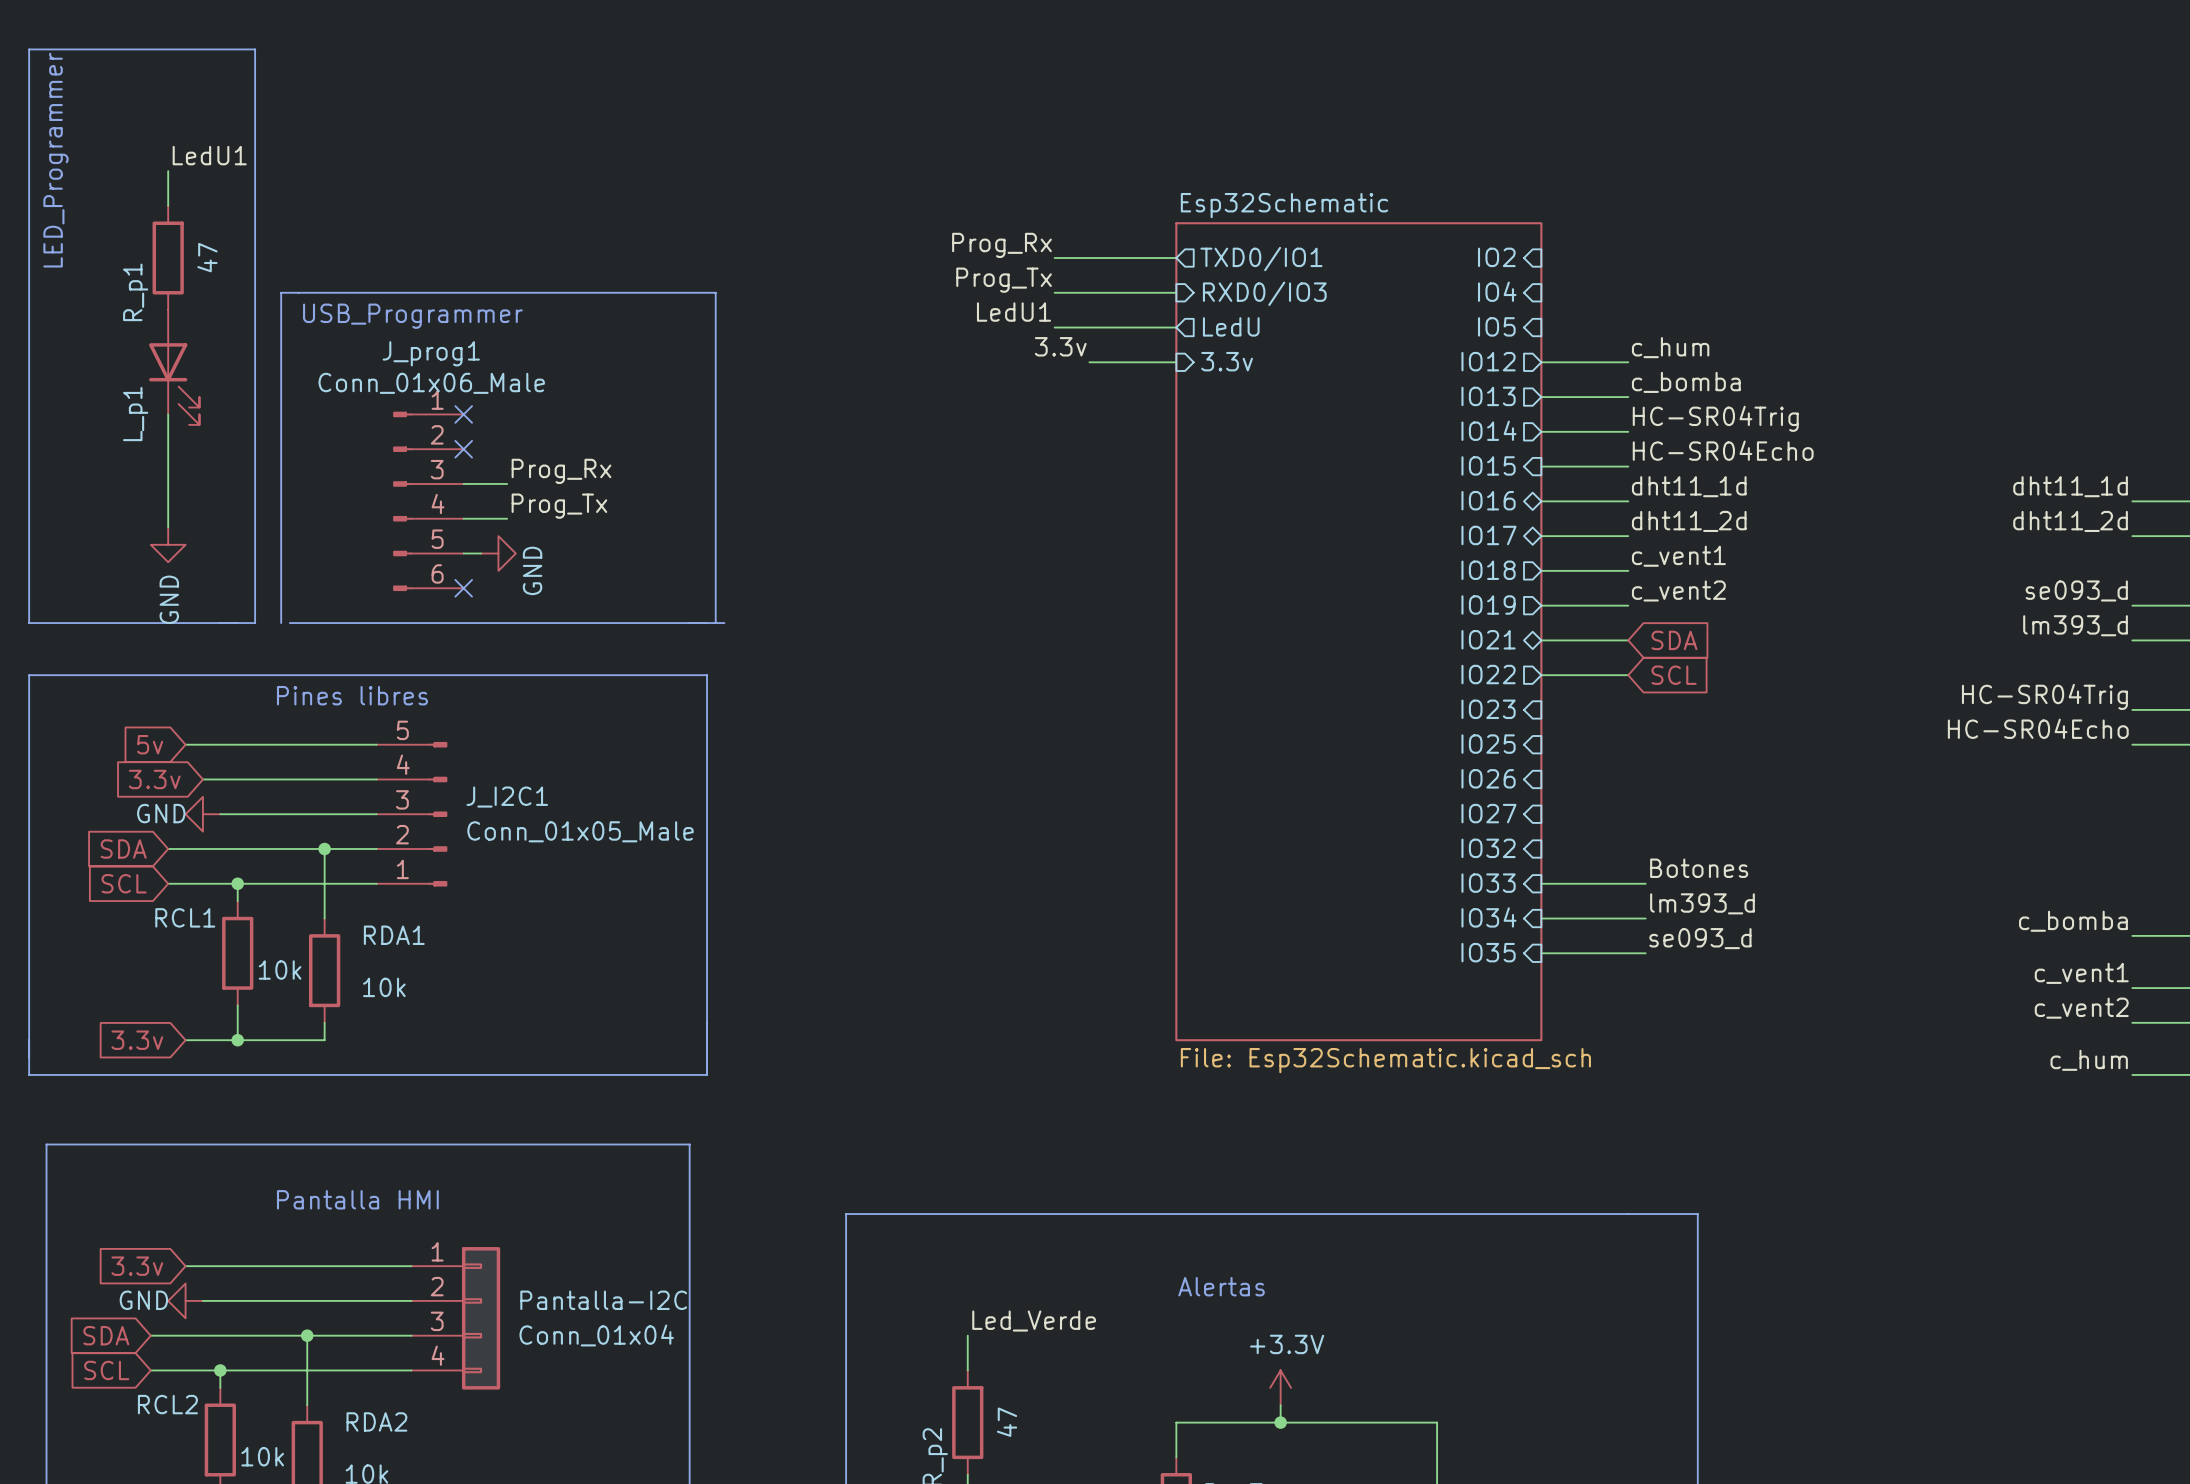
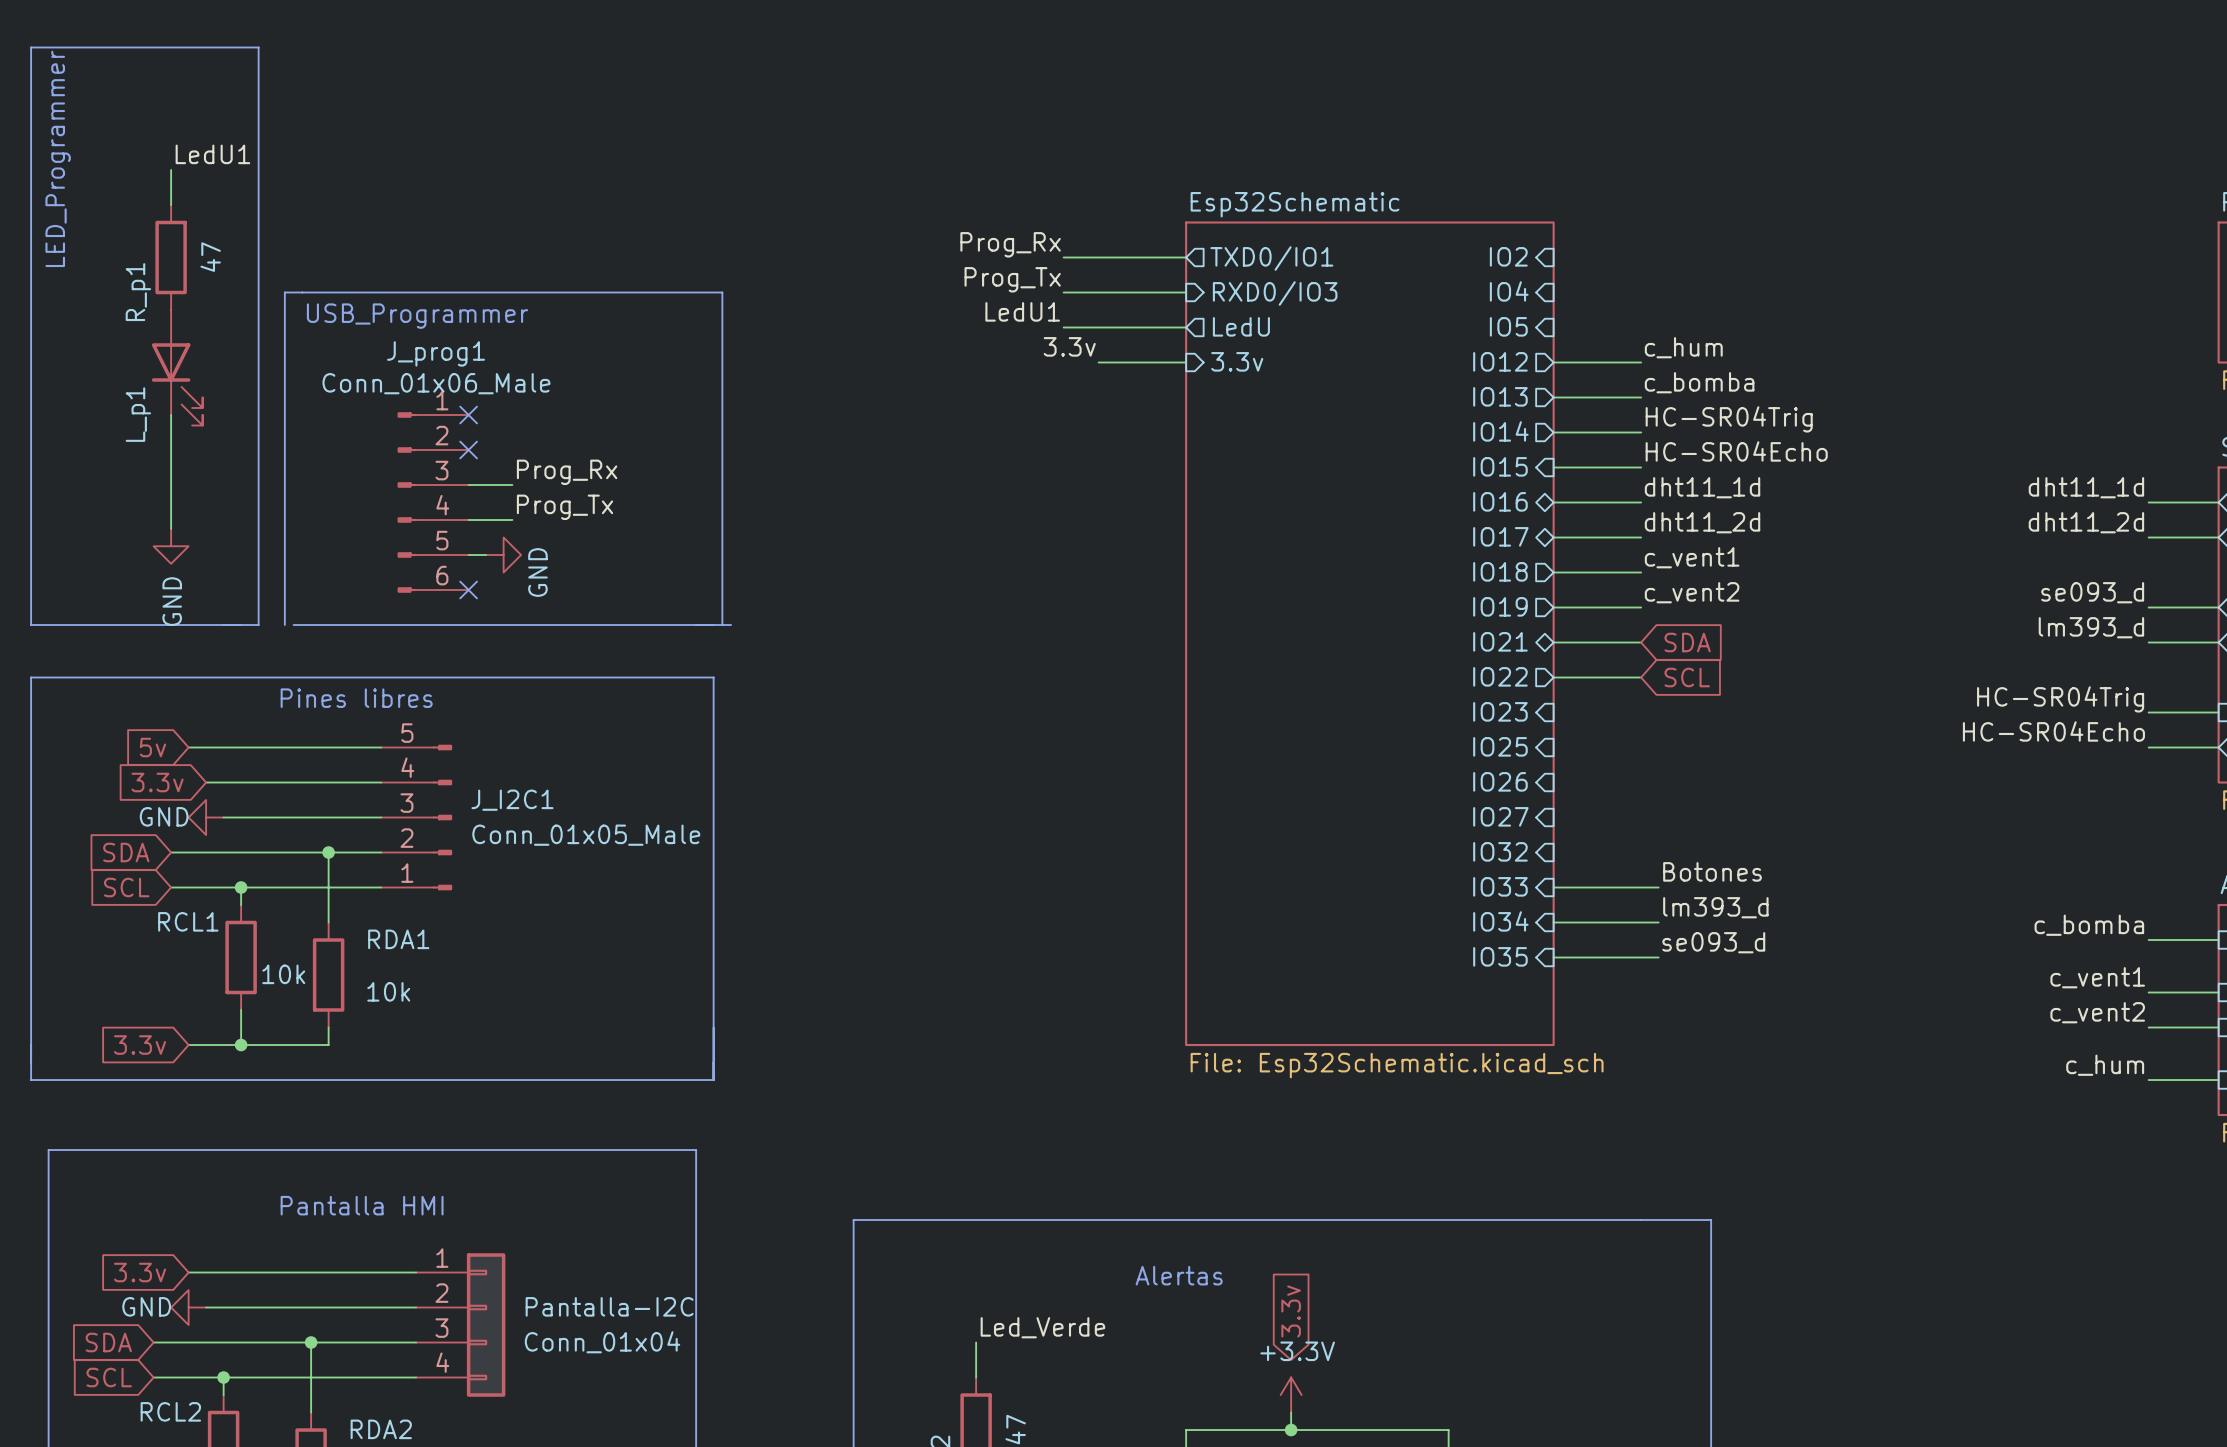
text position: Alertas (1221, 1286) -> Alertas (1179, 1275)
global label: none -> 3.3v (1291, 1311)

